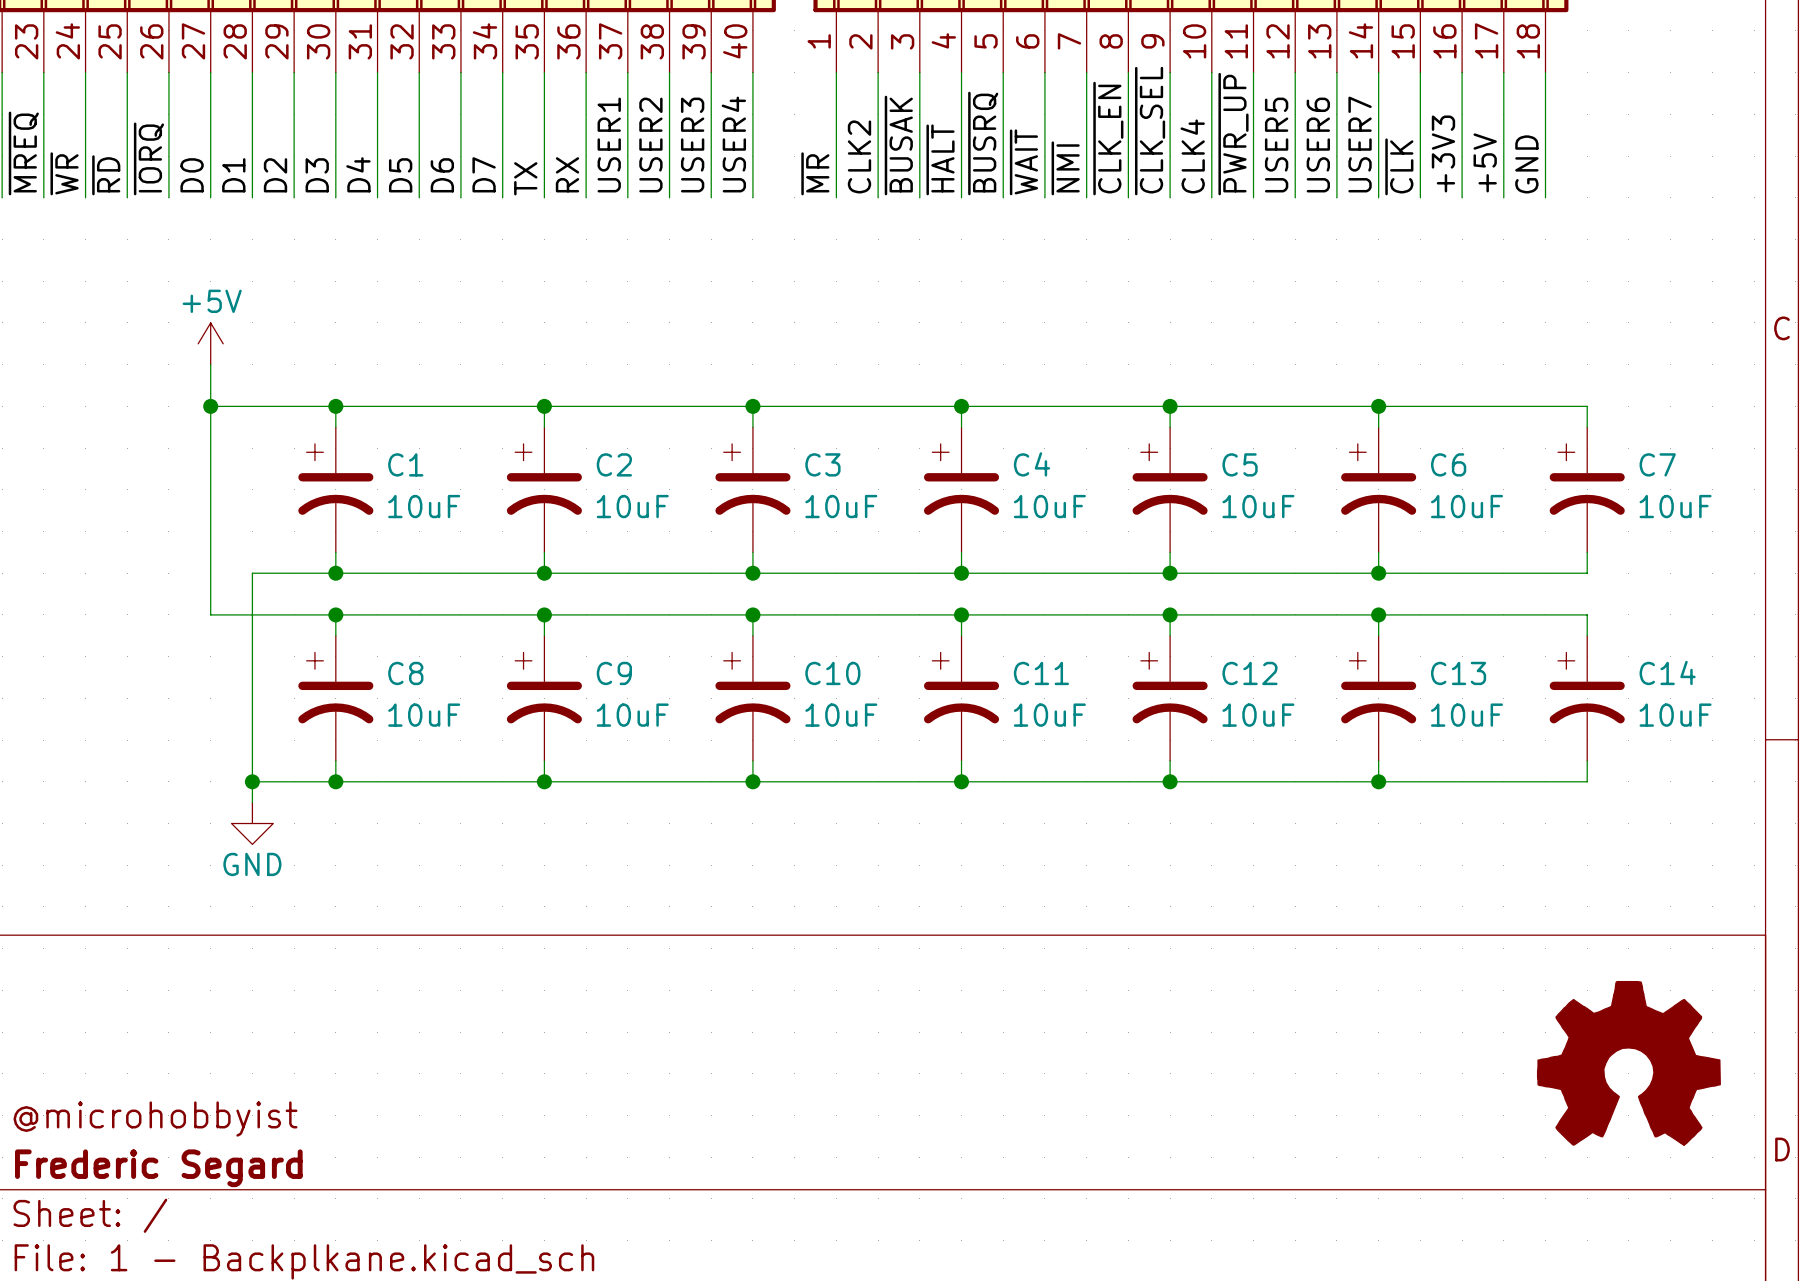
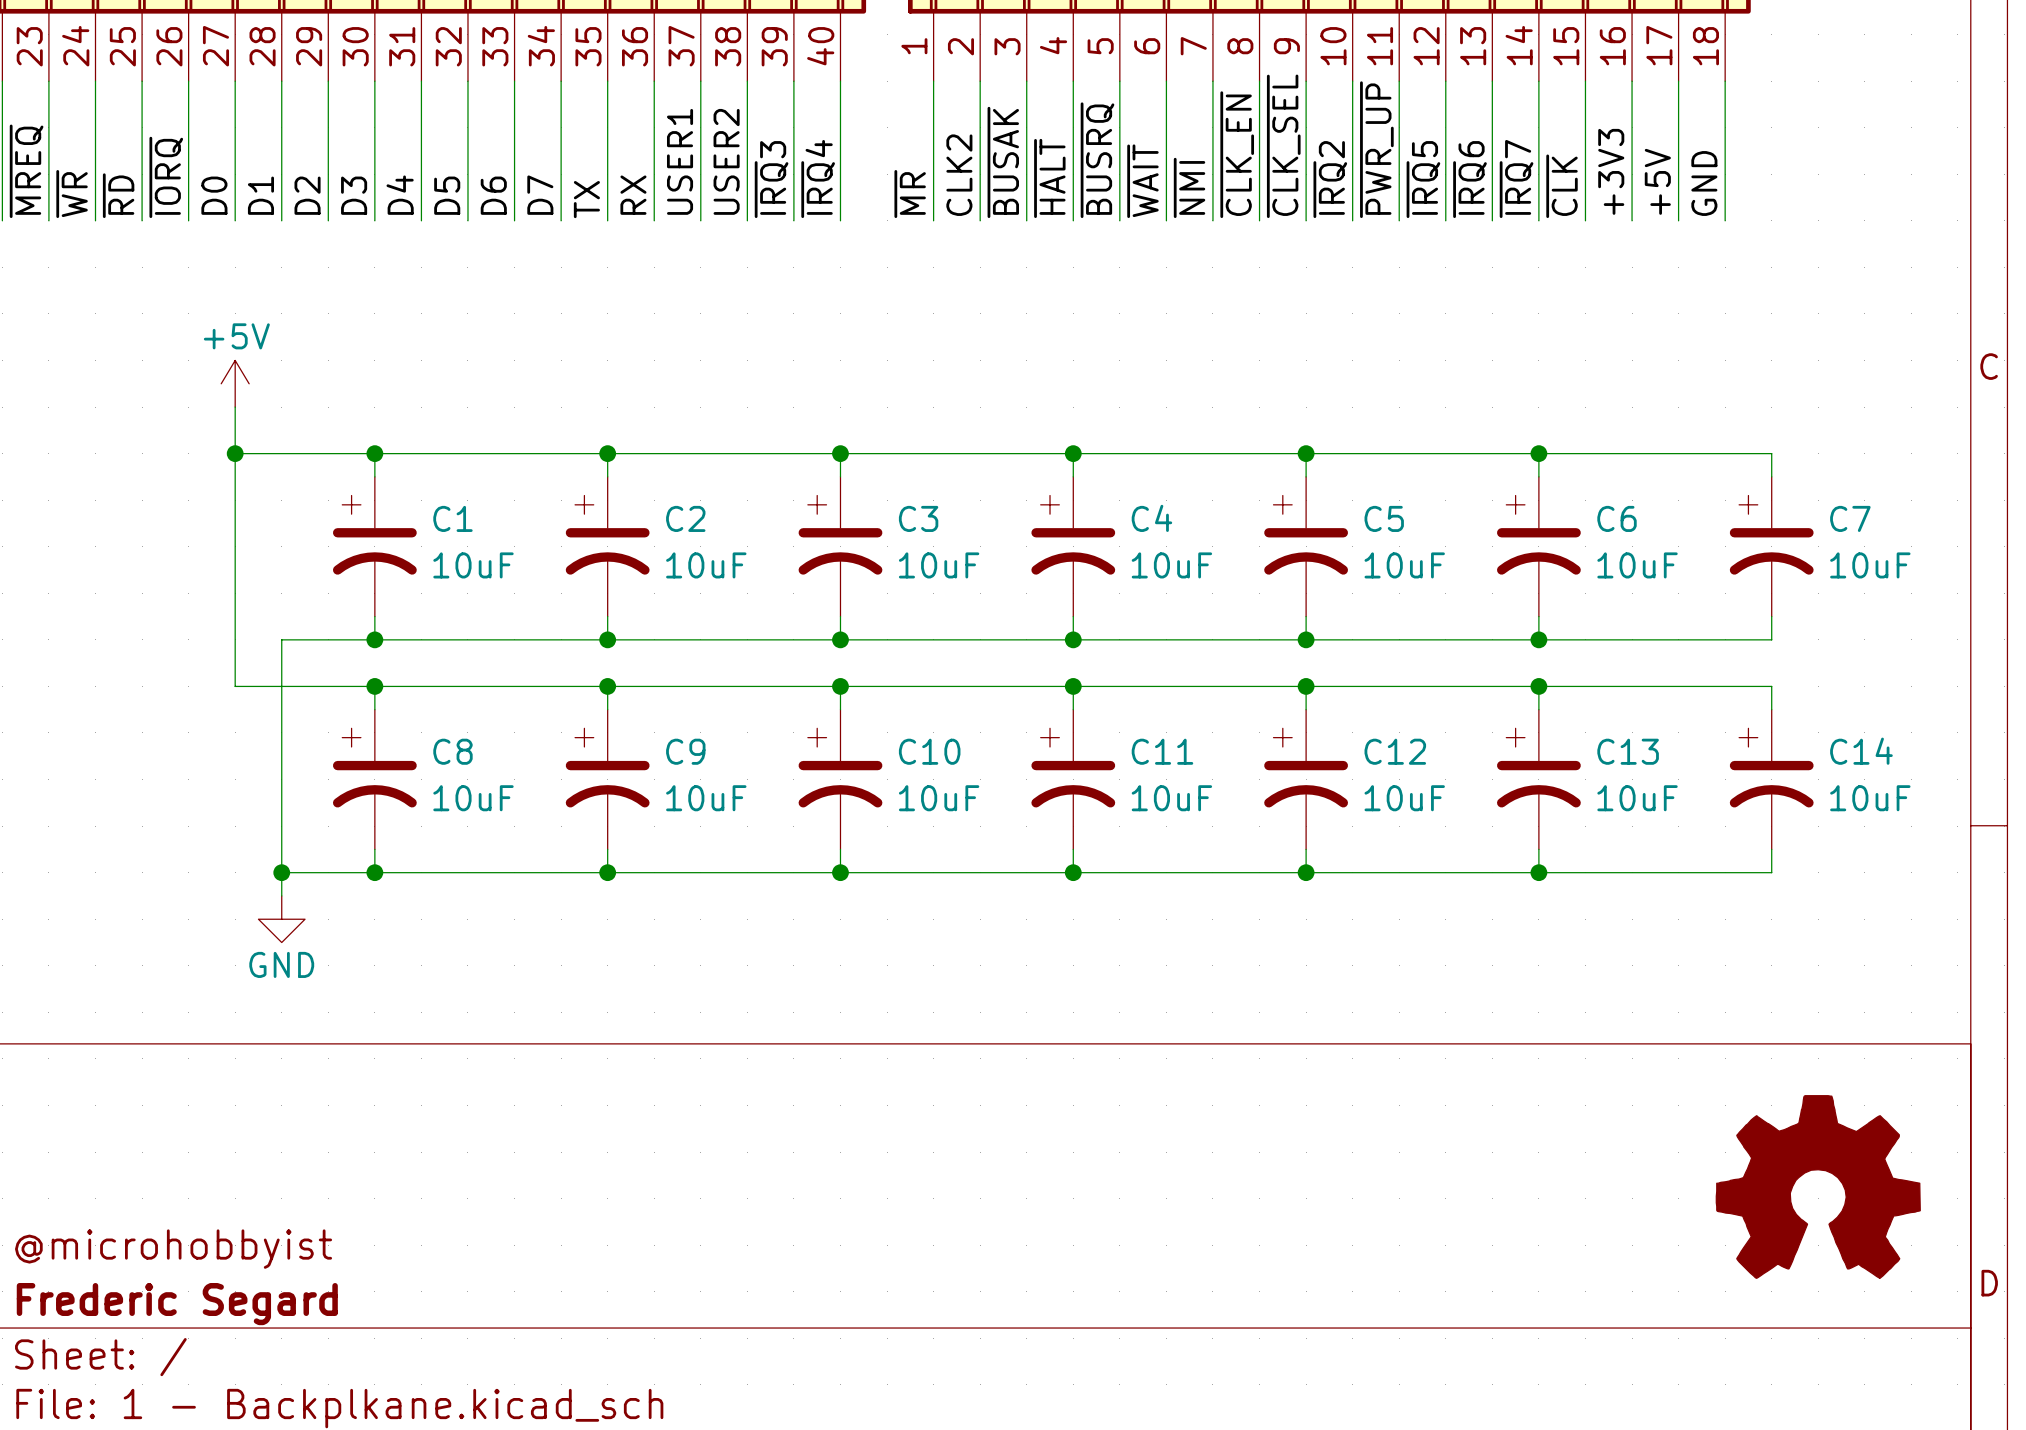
label: USER4 (733, 144) -> ~{IRQ}4 (818, 179)
label: USER7 (1360, 144) -> ~{IRQ}7 (1516, 179)
label: USER3 (692, 145) -> ~{IRQ}3 (771, 179)
label: USER5 (1276, 145) -> ~{IRQ}5 (1423, 179)
label: USER6 (1318, 145) -> ~{IRQ}6 (1470, 179)
label: CLK4 (1192, 156) -> ~{IRQ}2 (1330, 179)

